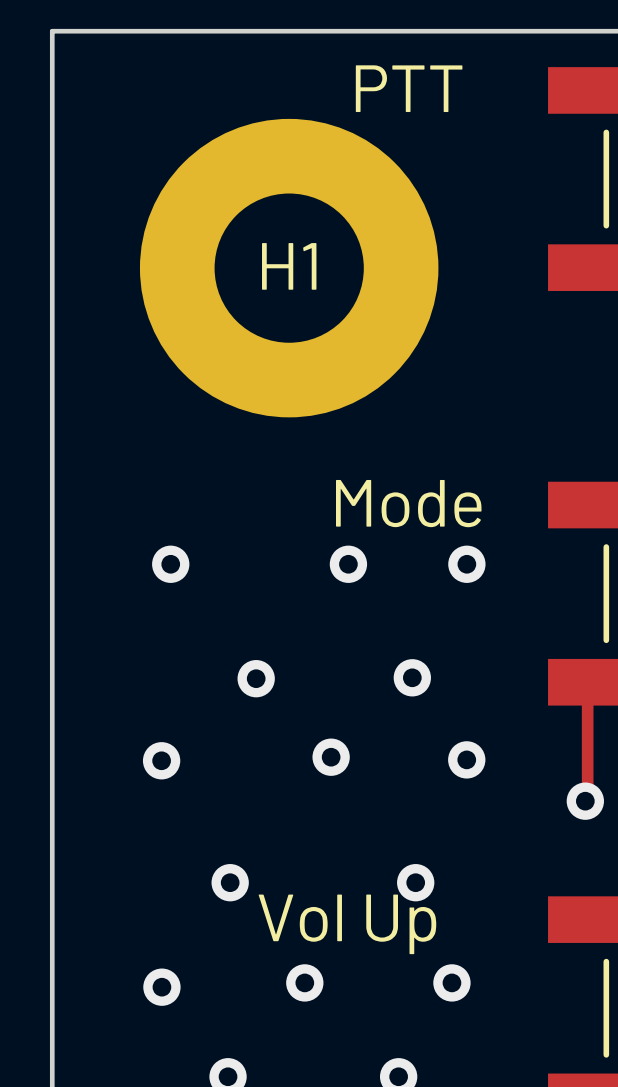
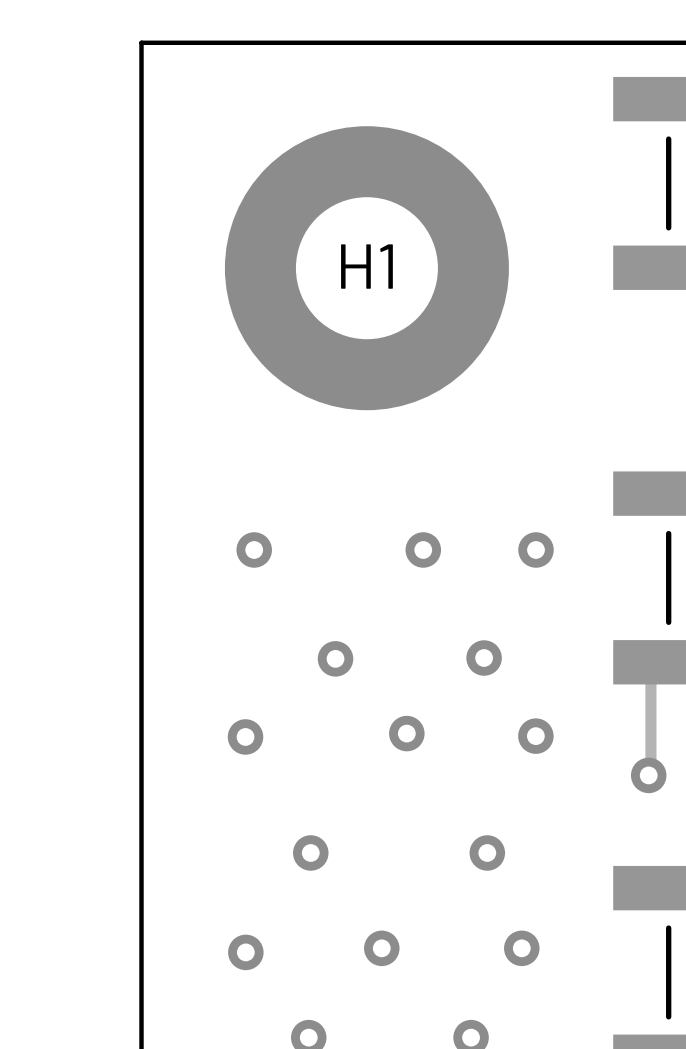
text: PTT (409, 88) -> none
text: Mode (408, 503) -> none
text: Vol Up (347, 924) -> none

